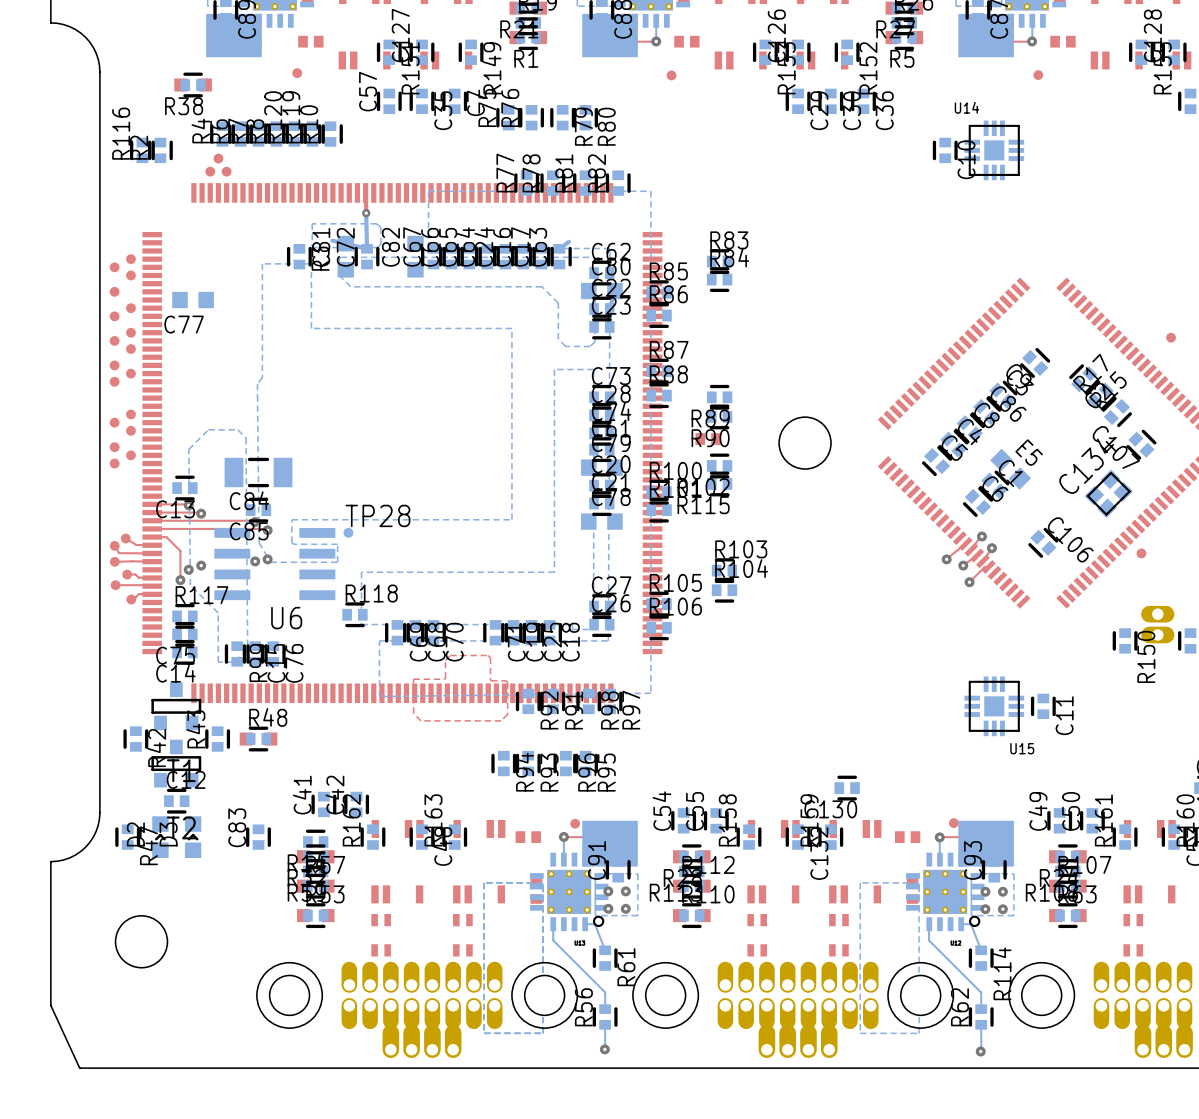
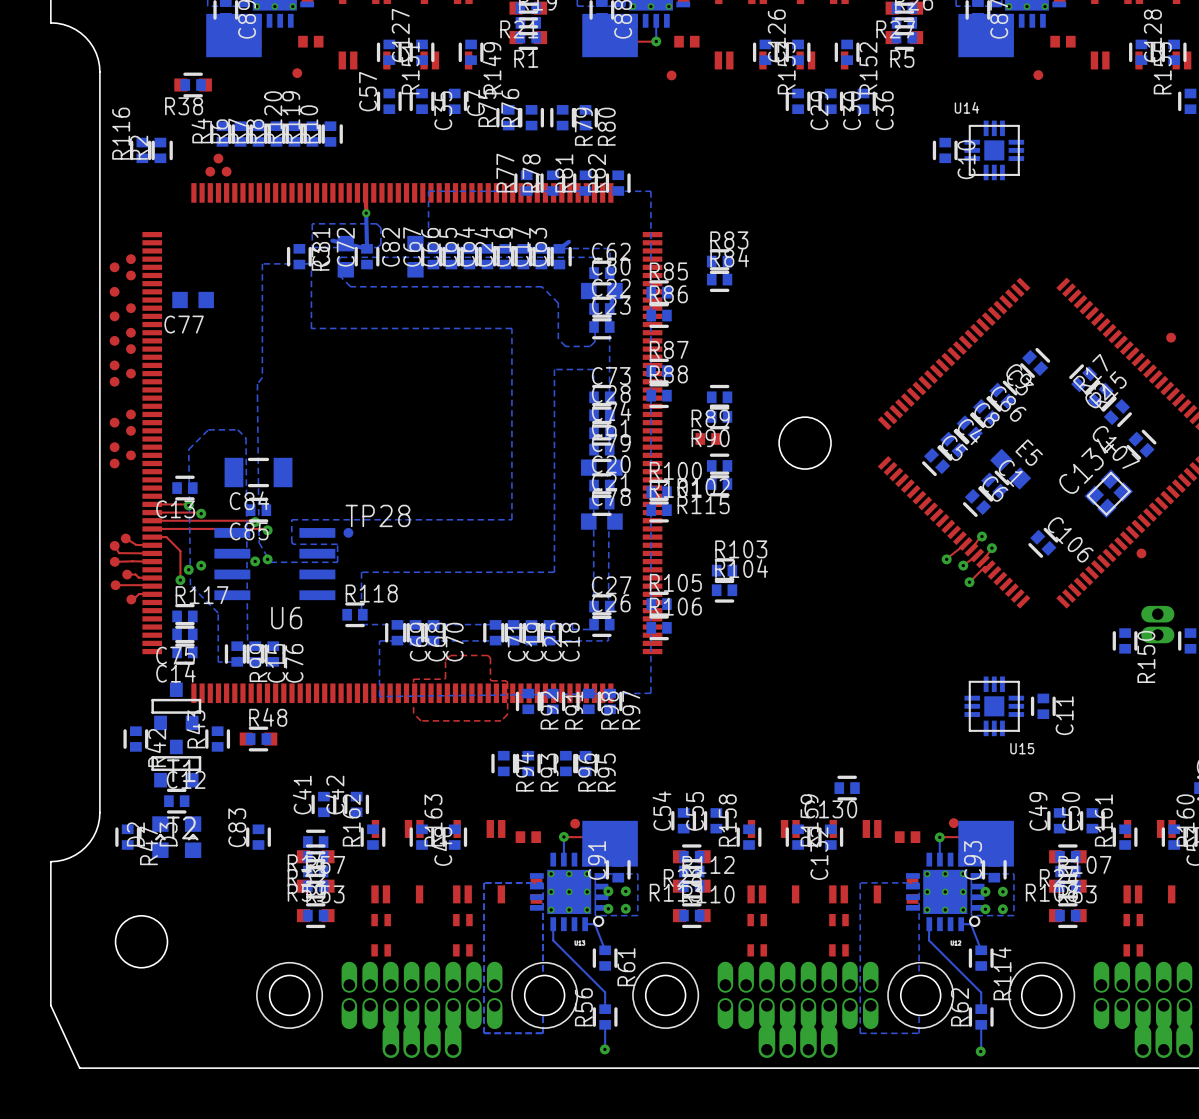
bottom track: (1032, 20) (1032, 41) -> none
top track: (1032, 41) (1008, 41) -> none
via: (1032, 41) -> none

